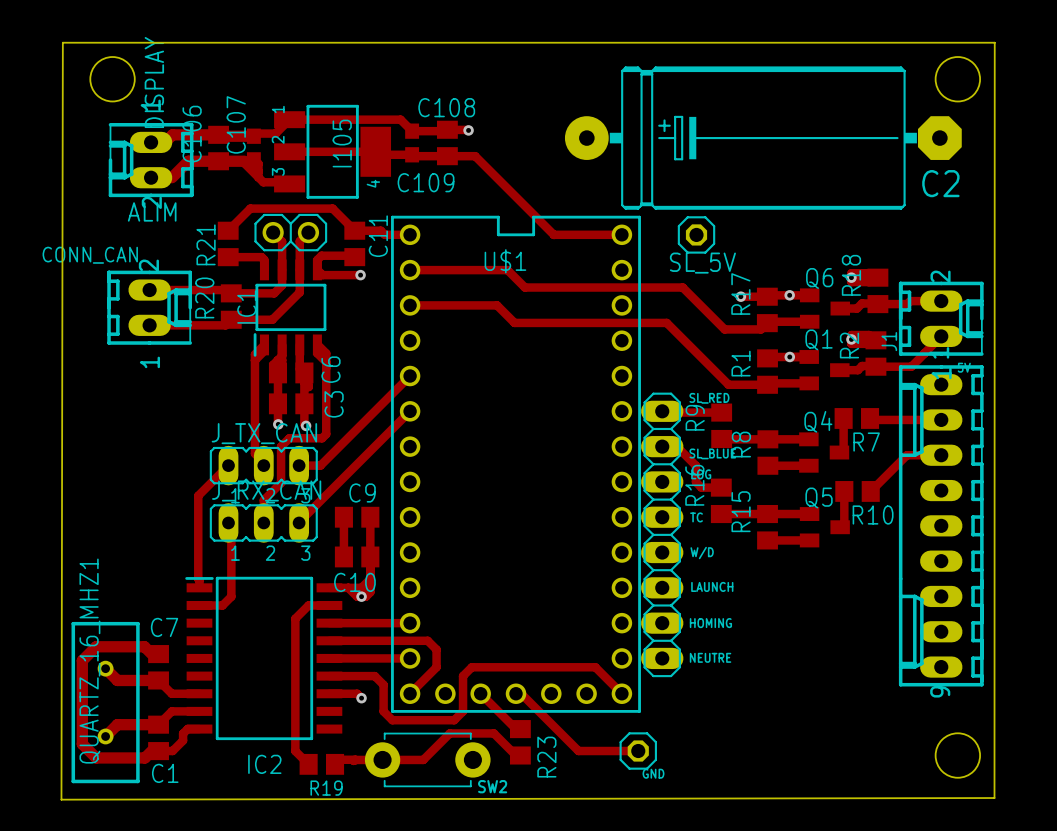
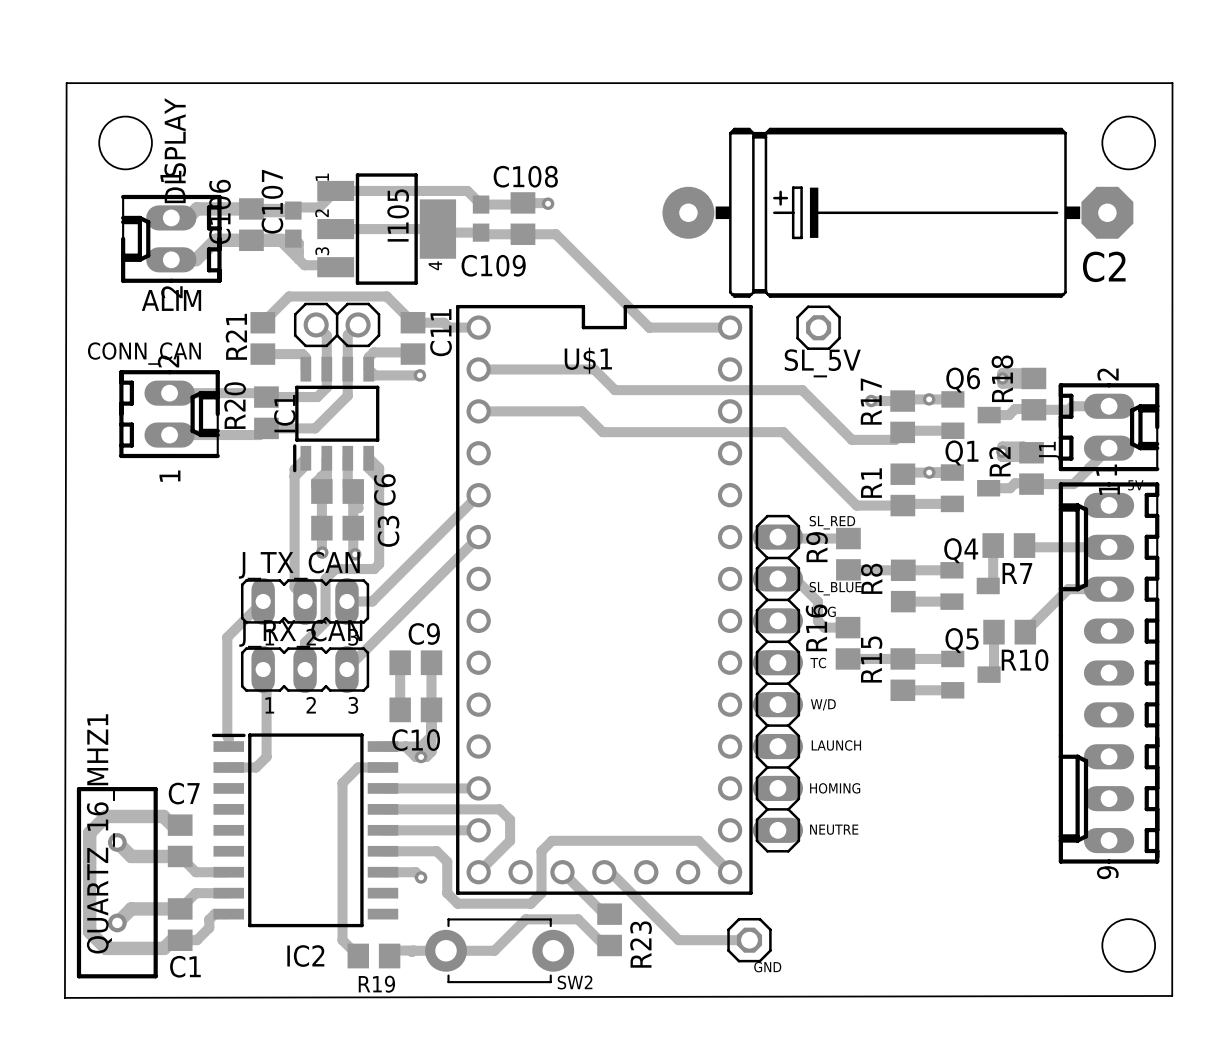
board edge: (62, 42) (994, 42) -> (66, 99) (66, 83) (1172, 83) (1172, 99)
CONN_CAN name position: CONN_CAN (90, 255) -> CONN_CAN (144, 353)

